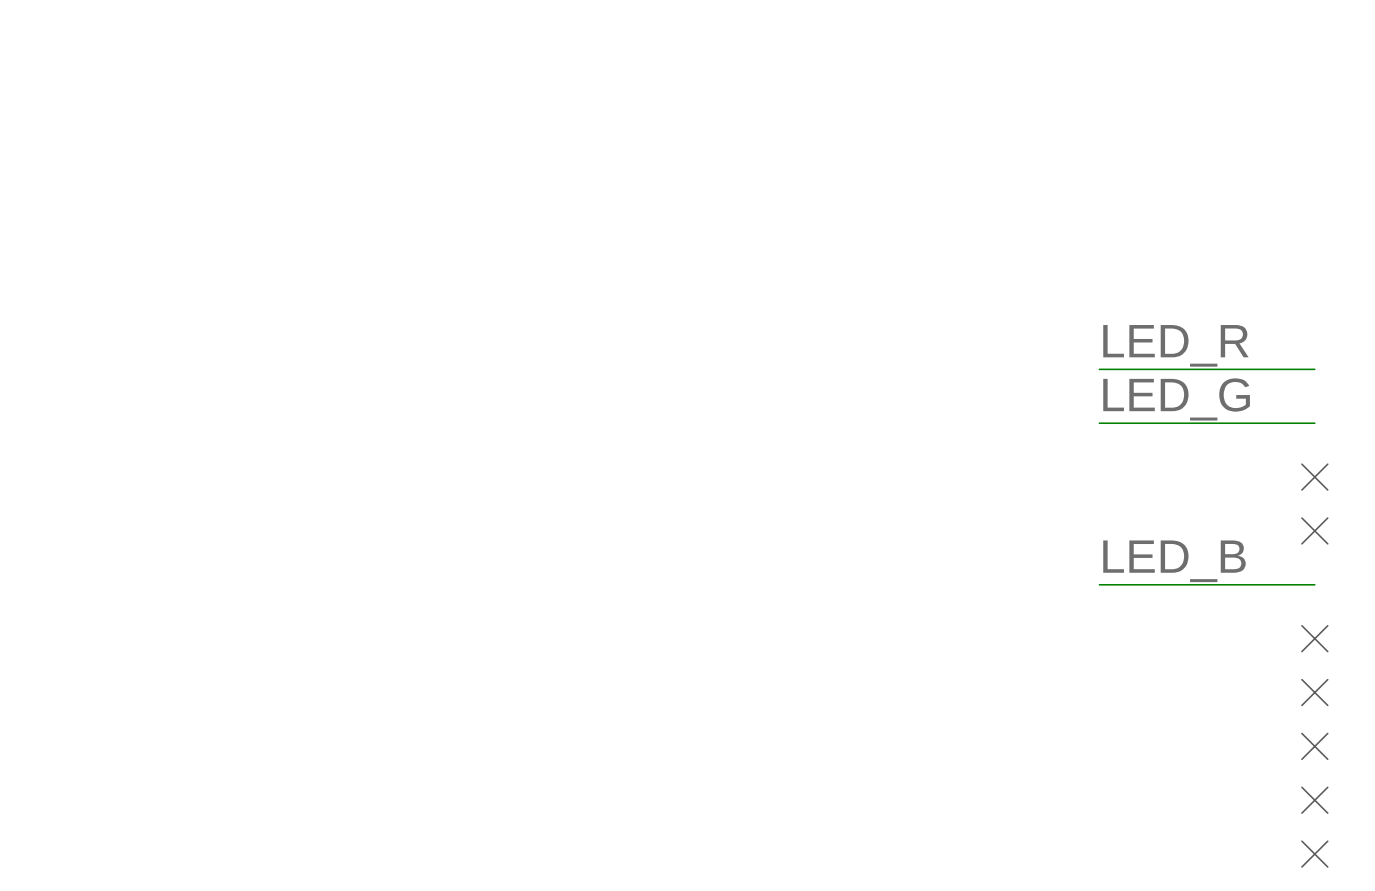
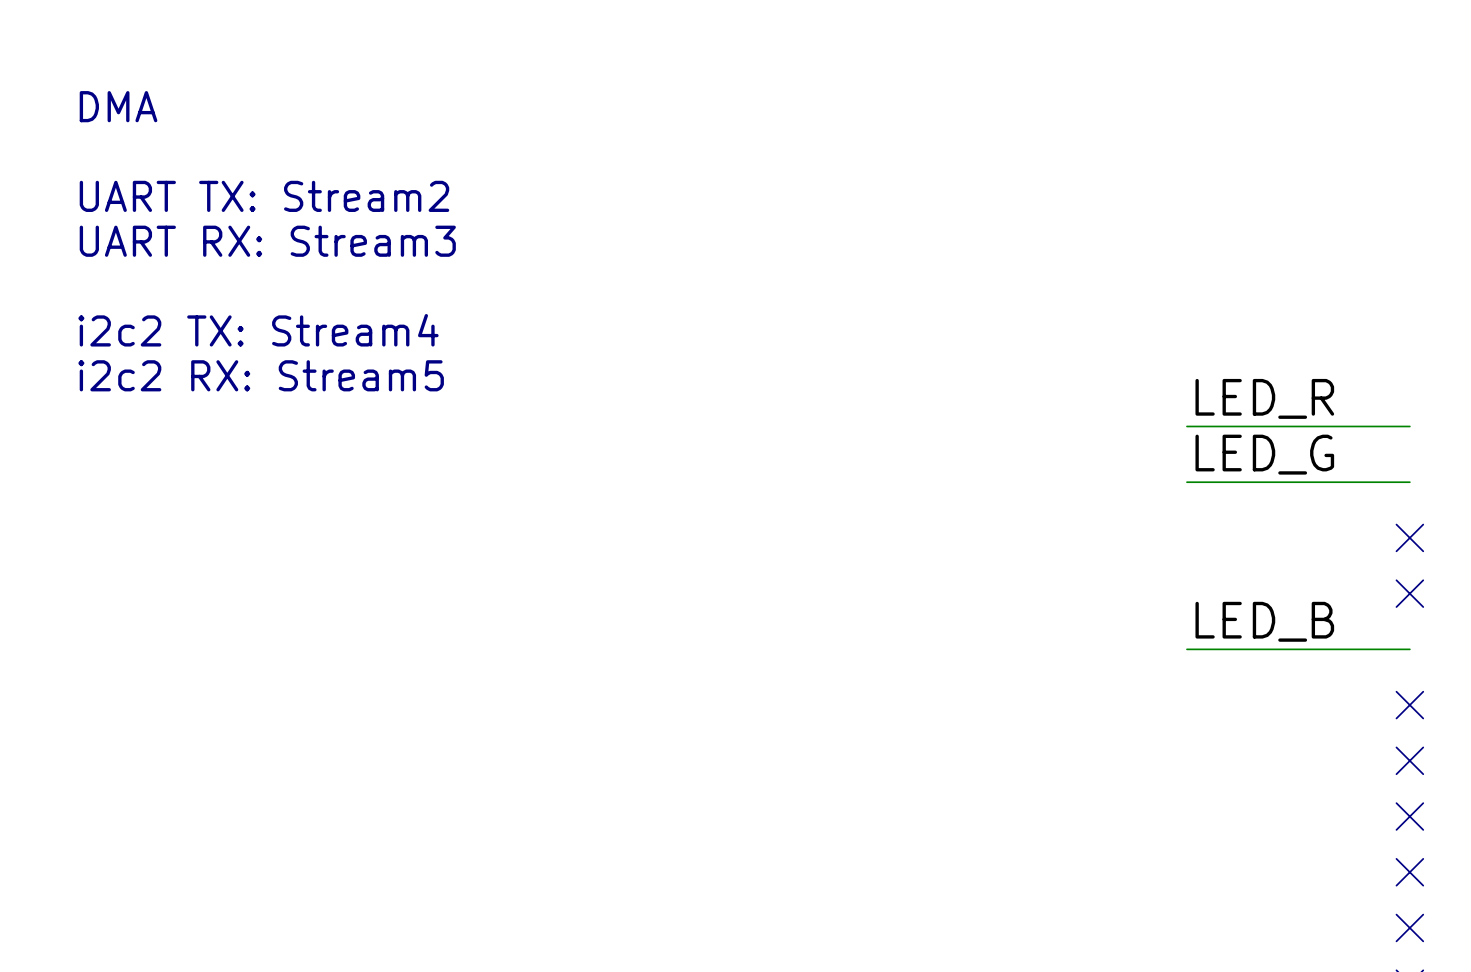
text: none -> DMA (118, 106)
text: none -> UART TX: Stream2 (264, 196)
text: none -> UART RX: Stream3 (267, 241)
text: none -> i2c2 TX: Stream4 (258, 330)
text: none -> i2c2 RX: Stream5 (261, 375)

